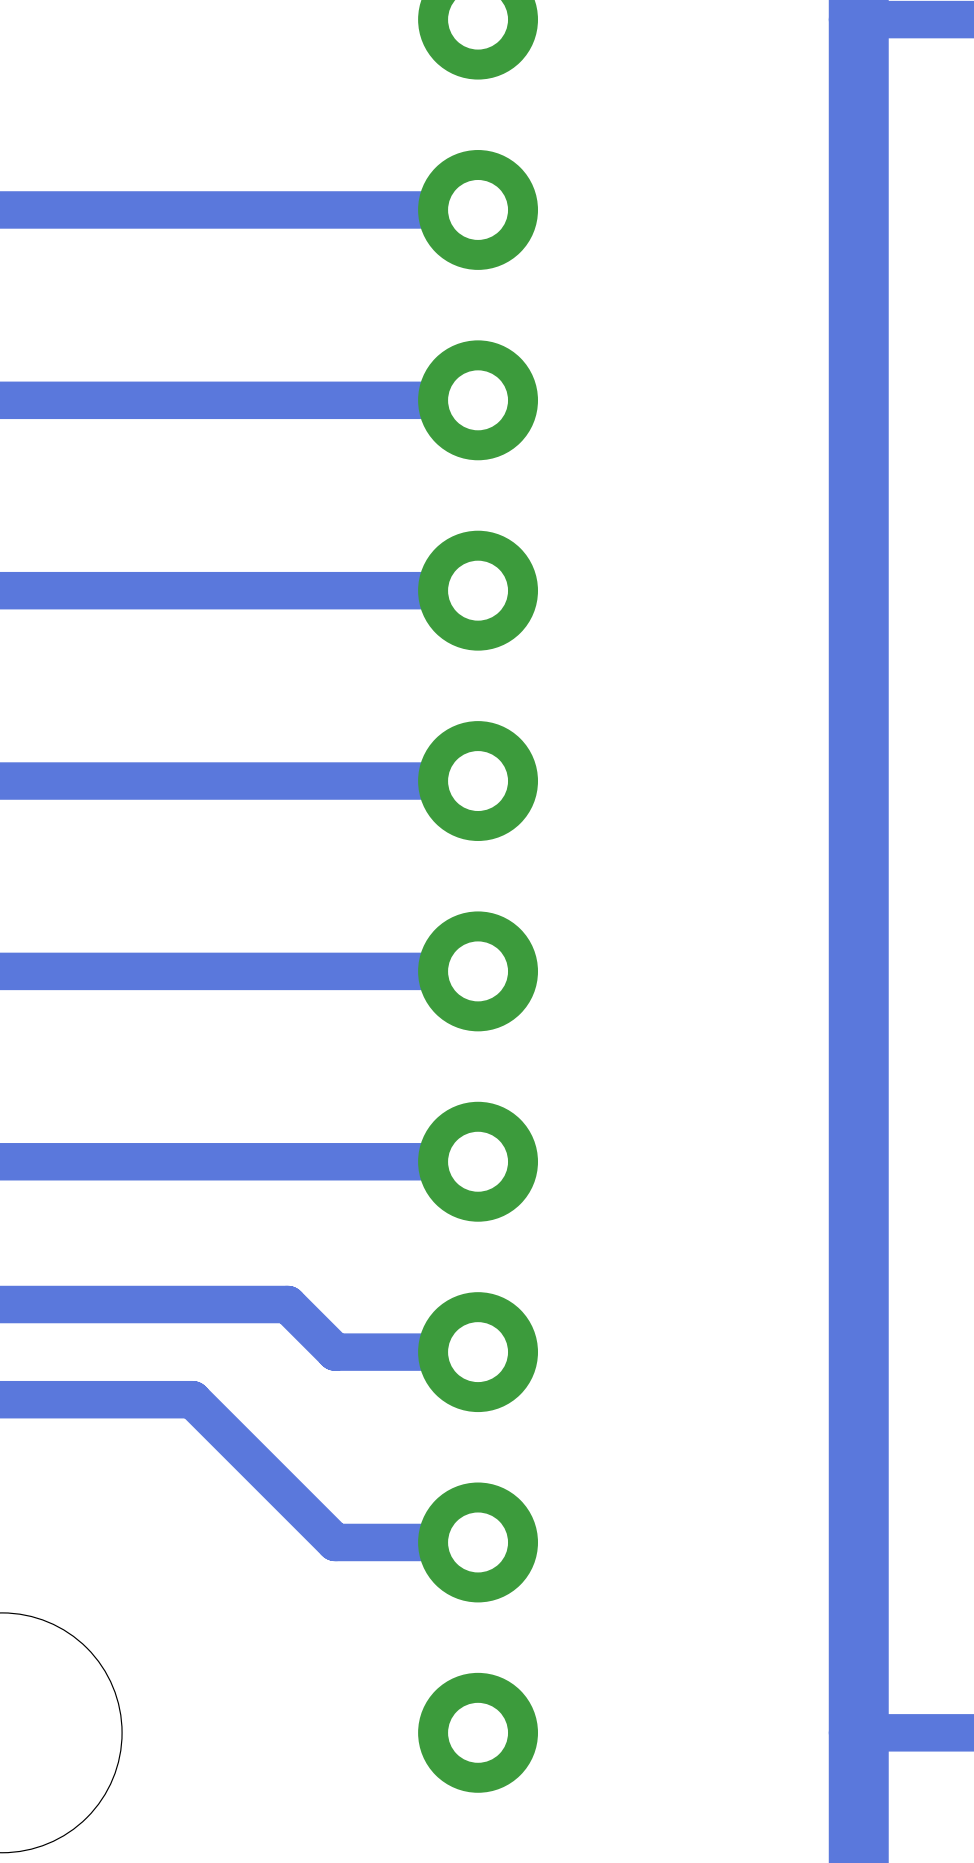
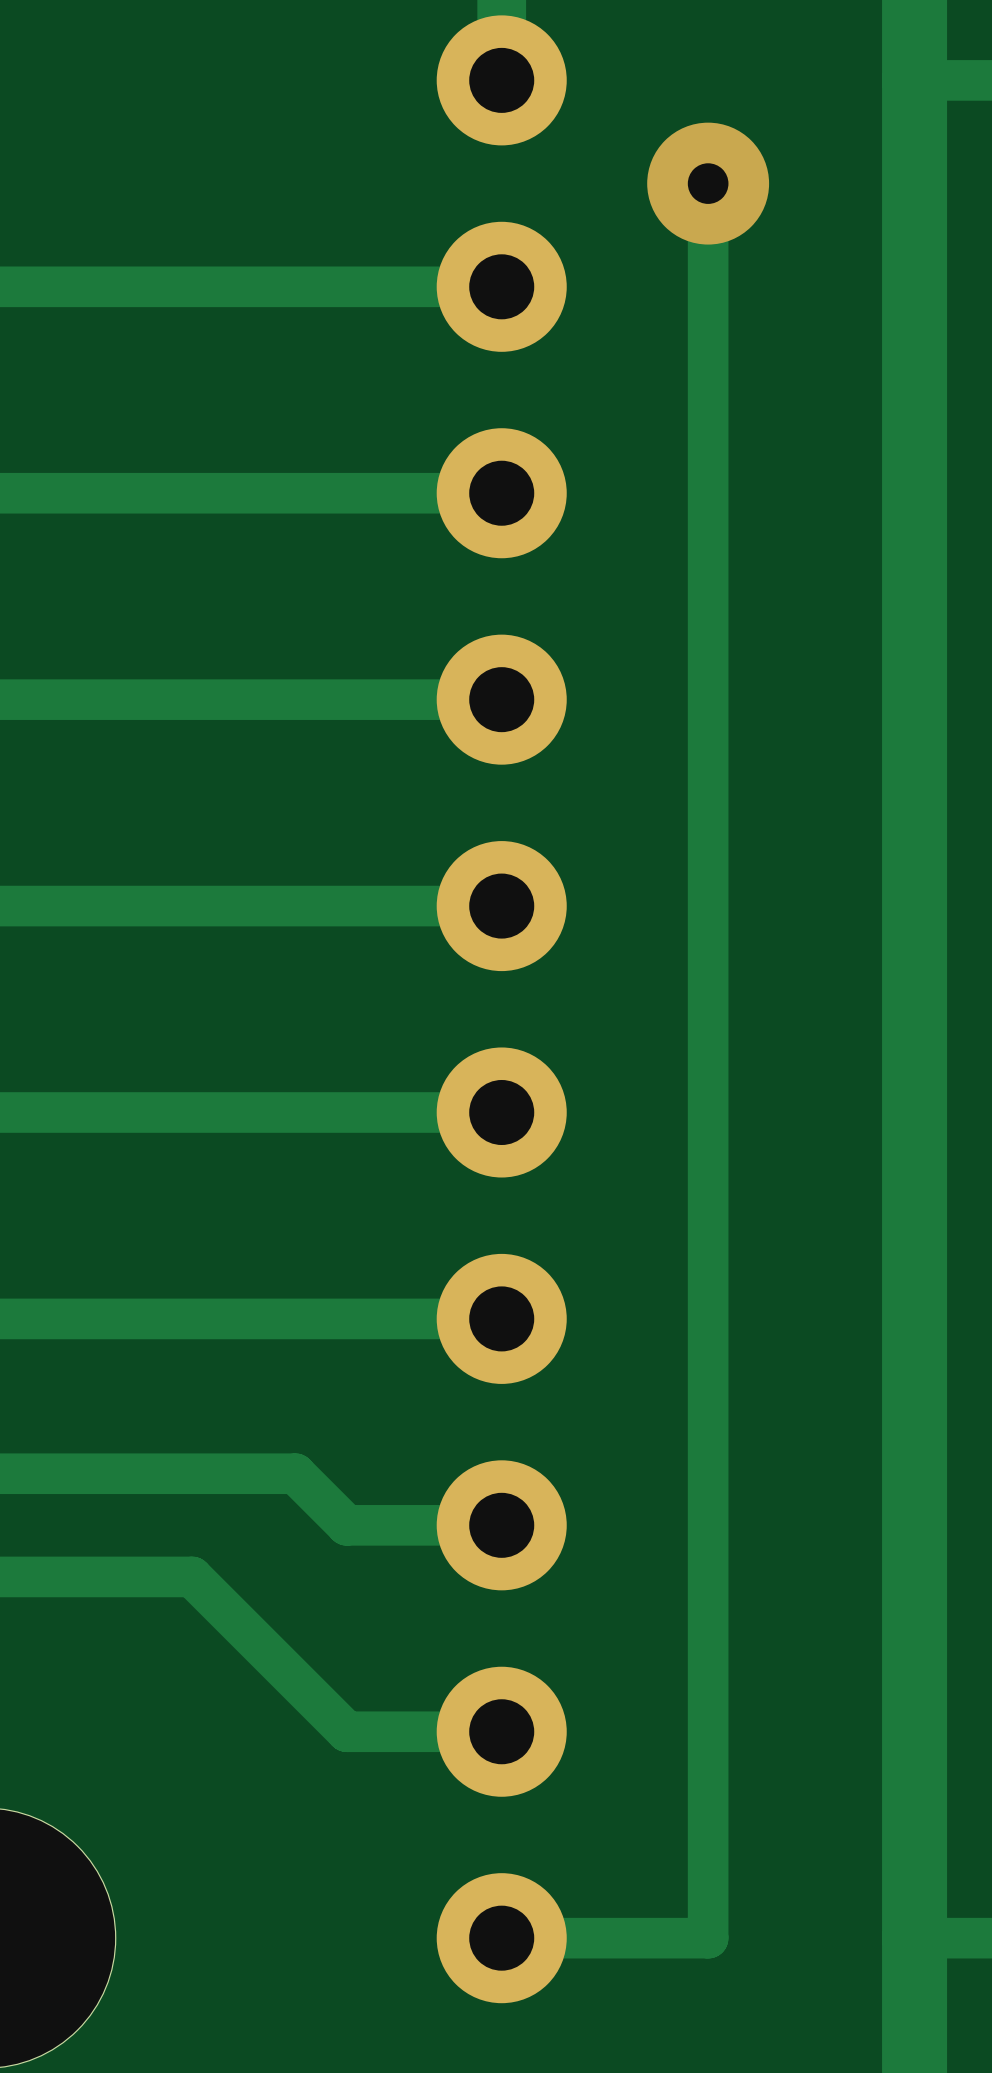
track: none -> (708, 183) (708, 1938) (501, 1938)
via: none -> (708, 183)

